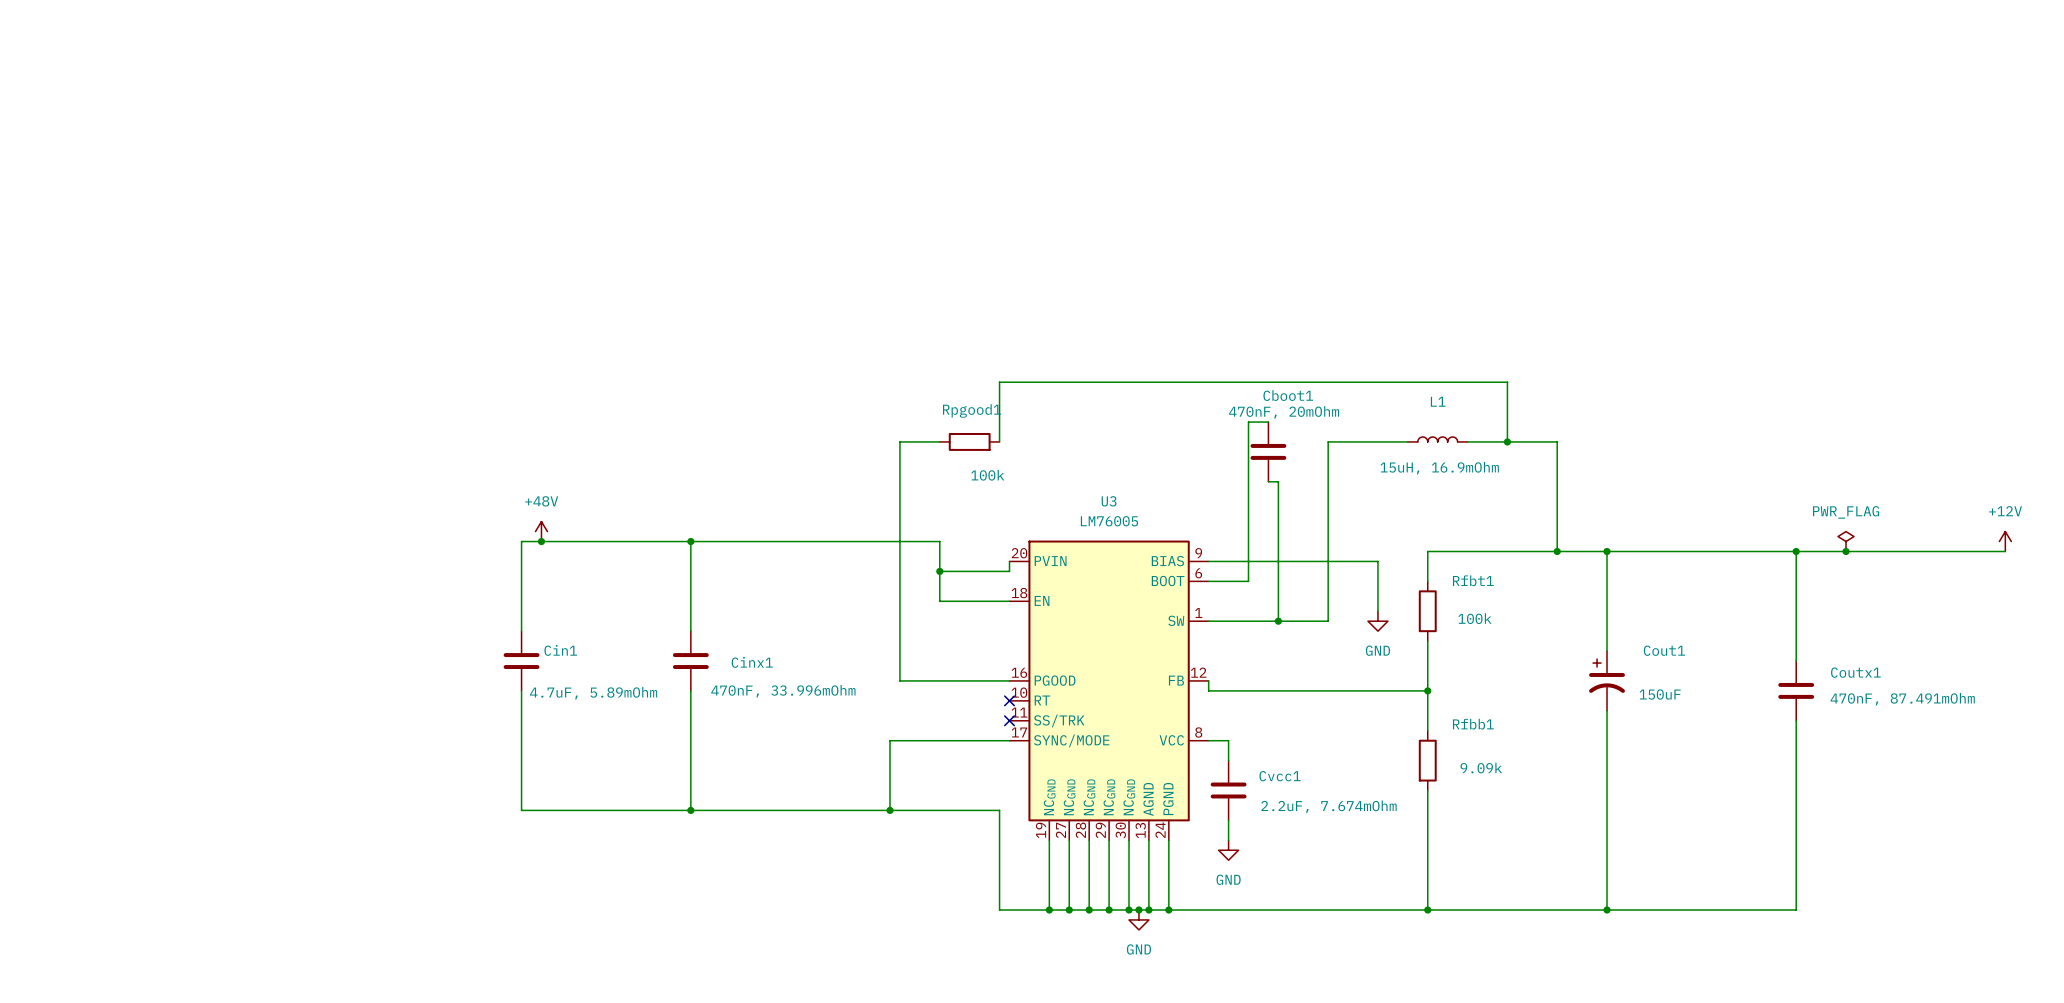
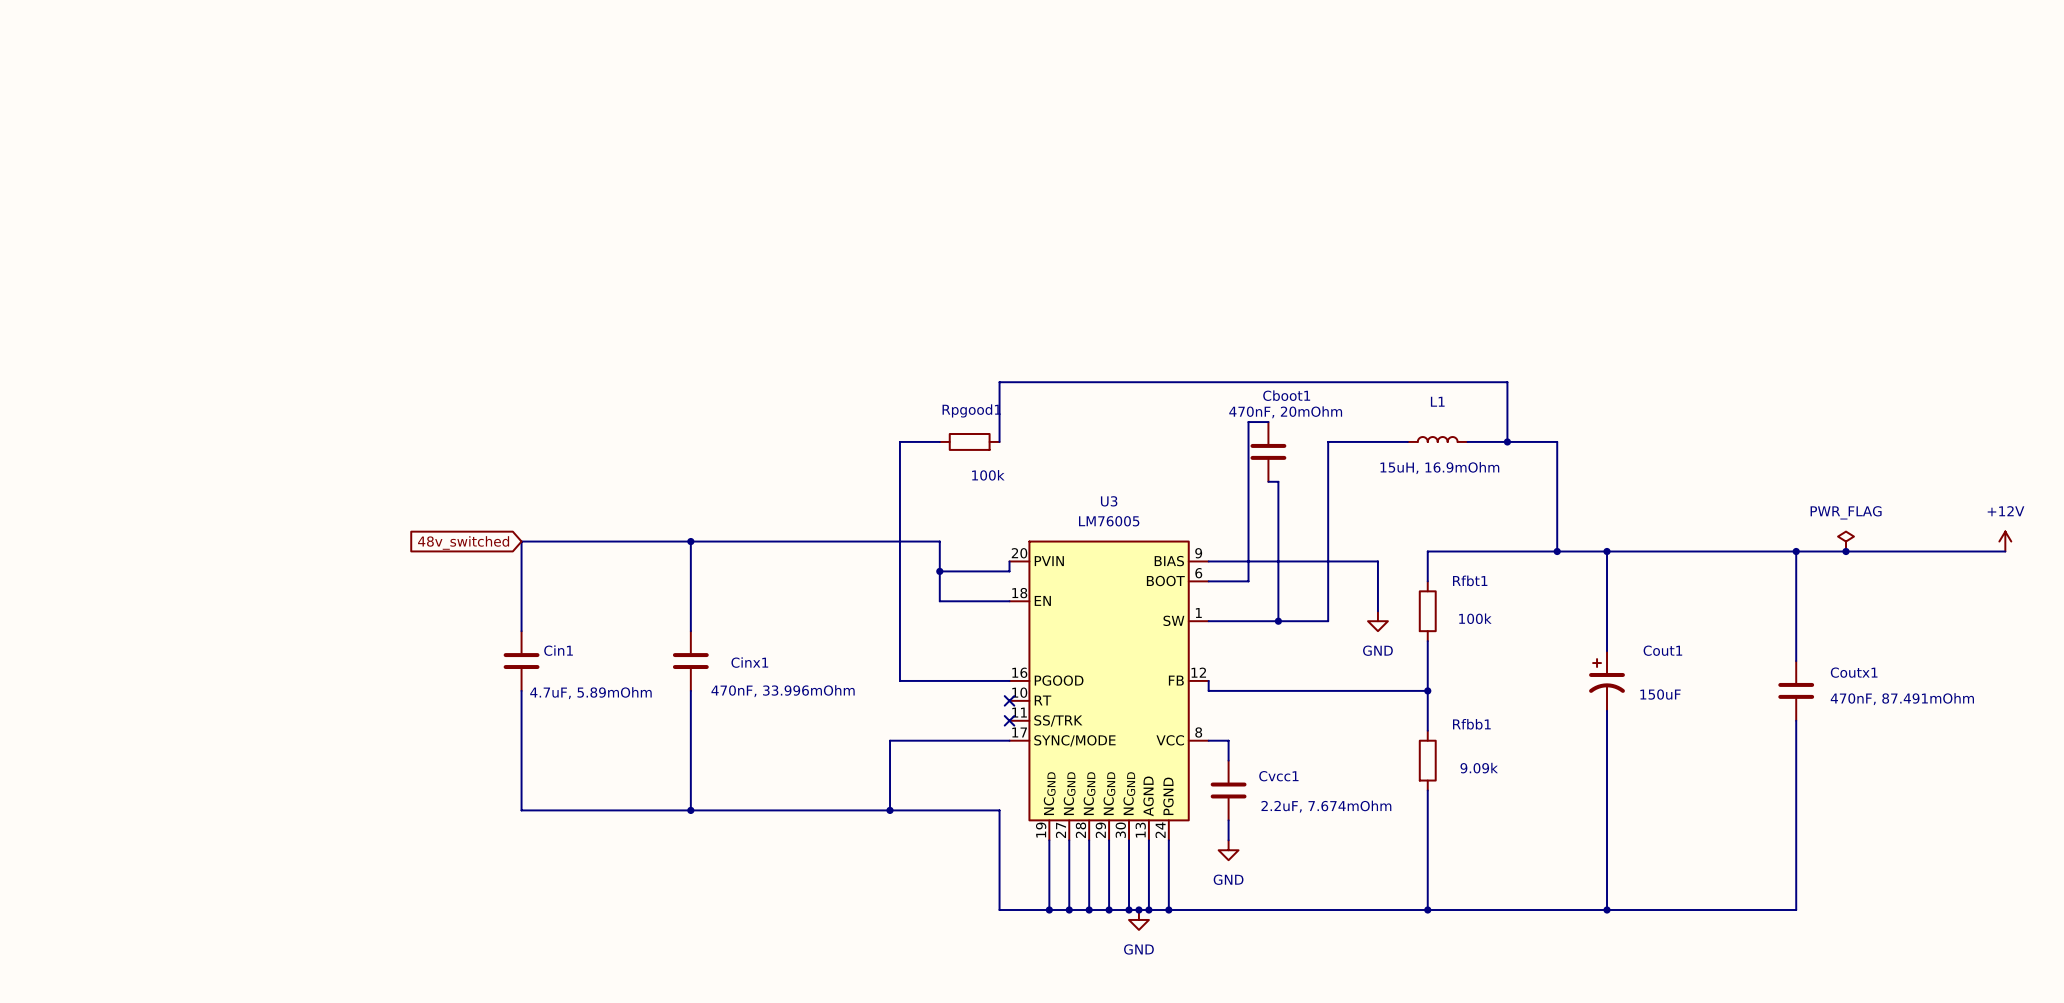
power symbol: +48V (541, 531) -> none
junction: (541, 541) -> none
global label: none -> 48v_switched (463, 542)

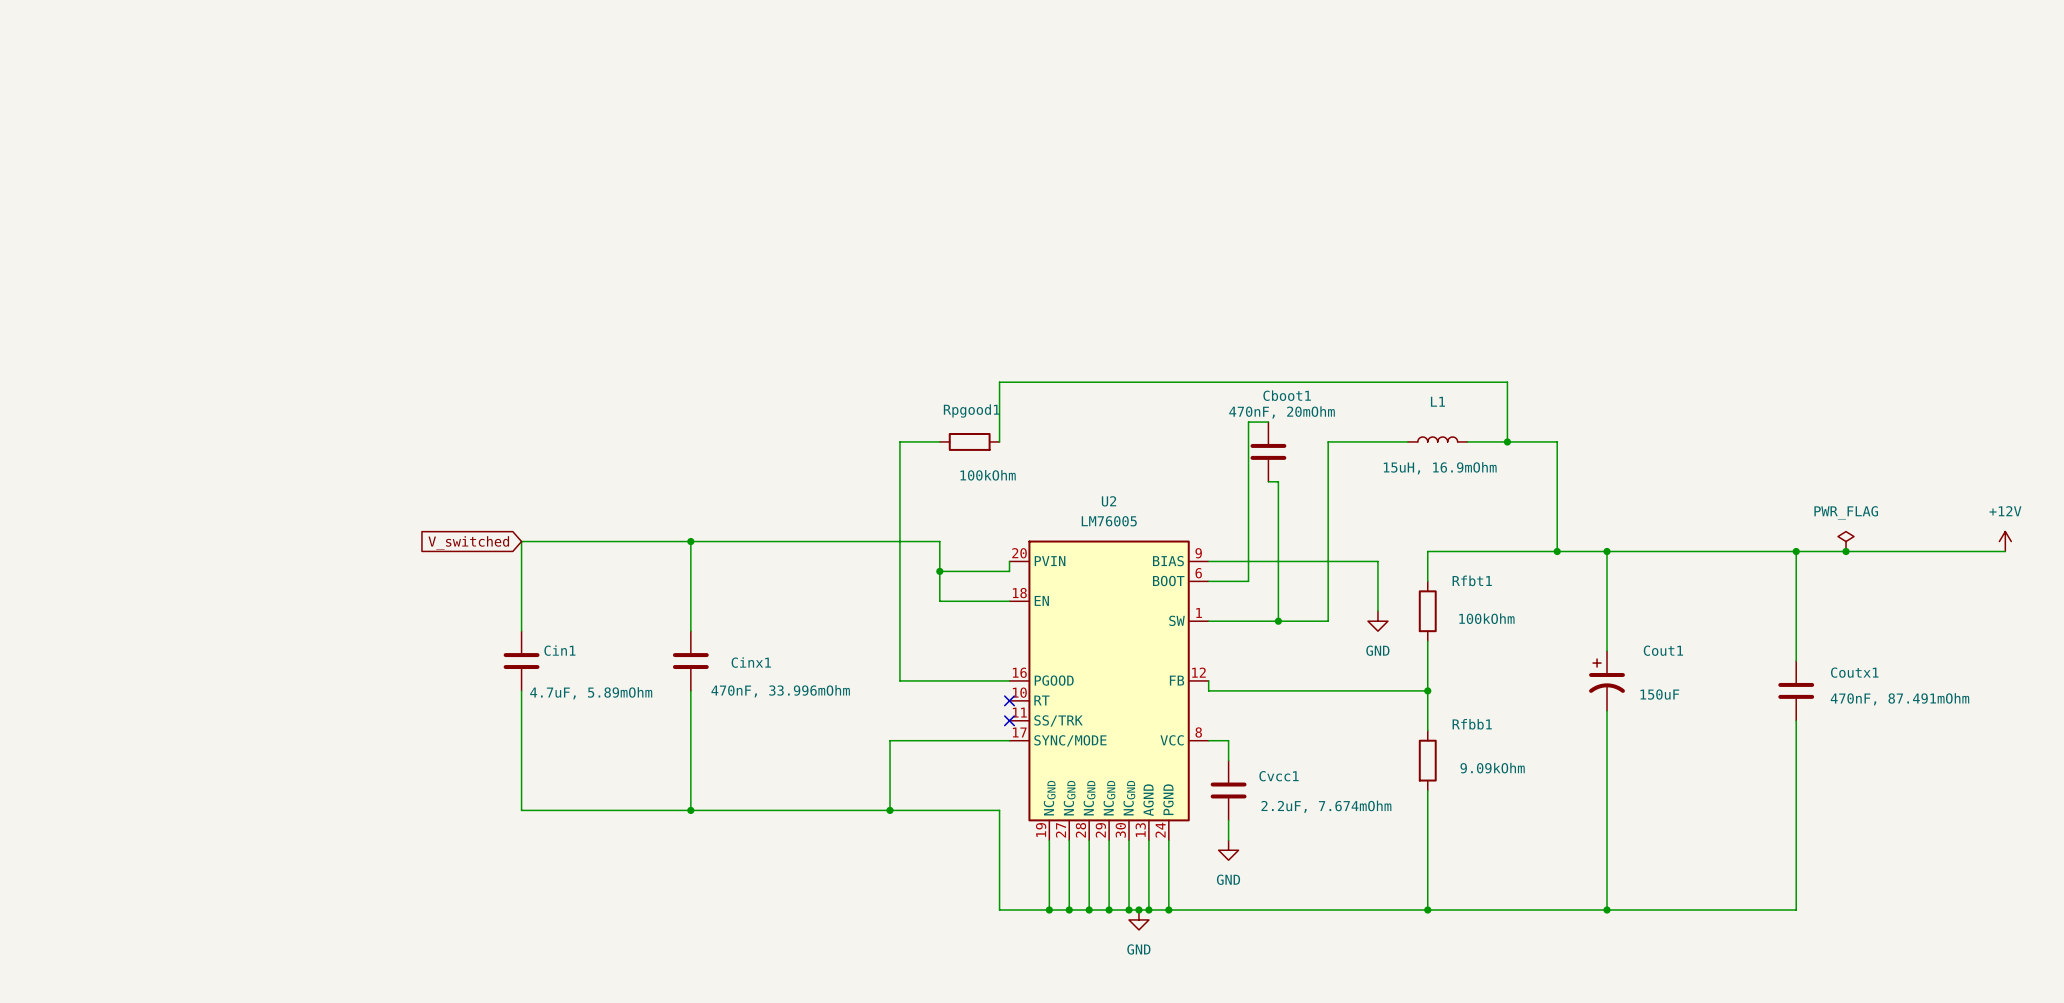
Rpgood1 value: 100k (988, 475) -> 100kOhm (988, 475)
U3 name: U3 (1109, 501) -> U2 (1109, 501)
global label: 48v_switched (463, 542) -> V_switched (468, 542)
Rfbt1 value: 100k (1475, 618) -> 100kOhm (1486, 618)
Rfbb1 value: 9.09k (1479, 768) -> 9.09kOhm (1492, 768)

